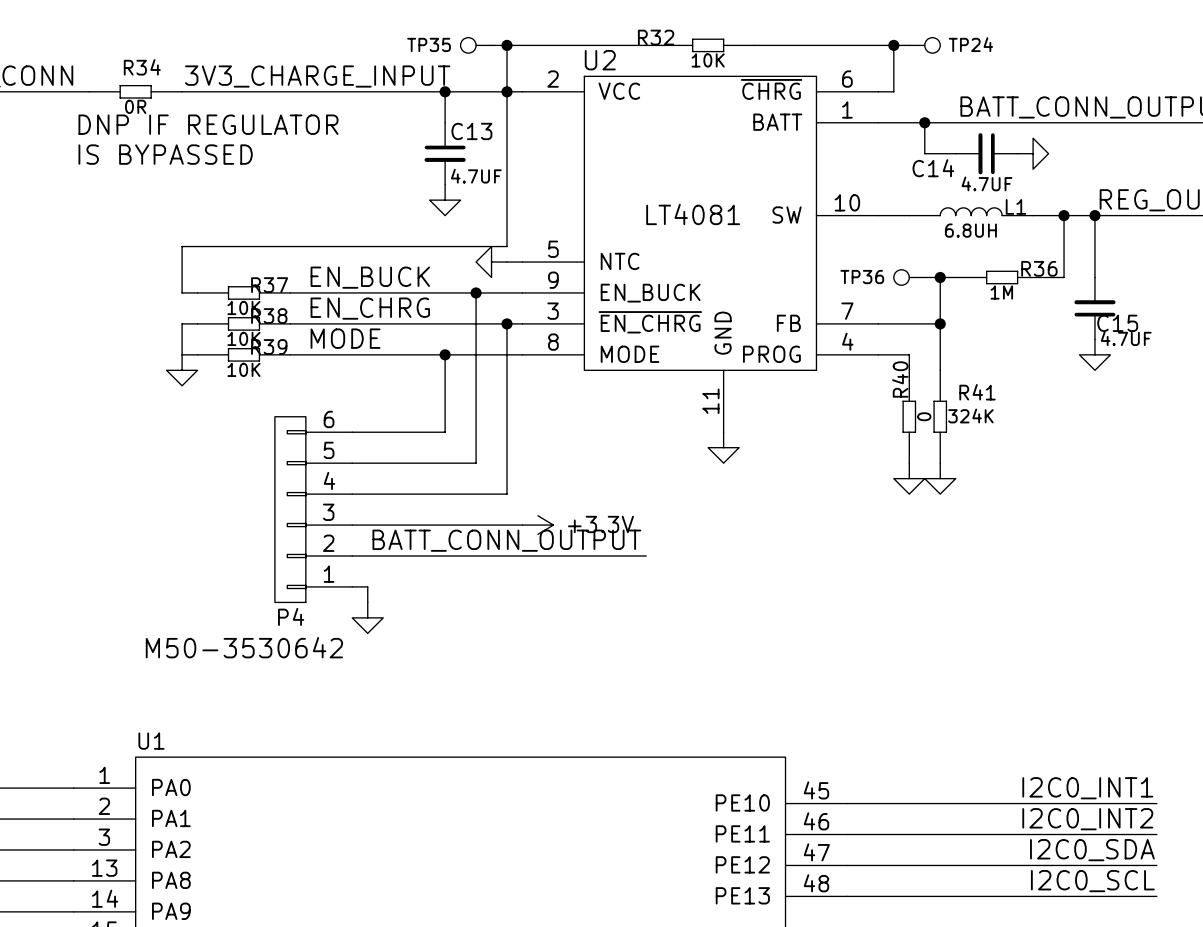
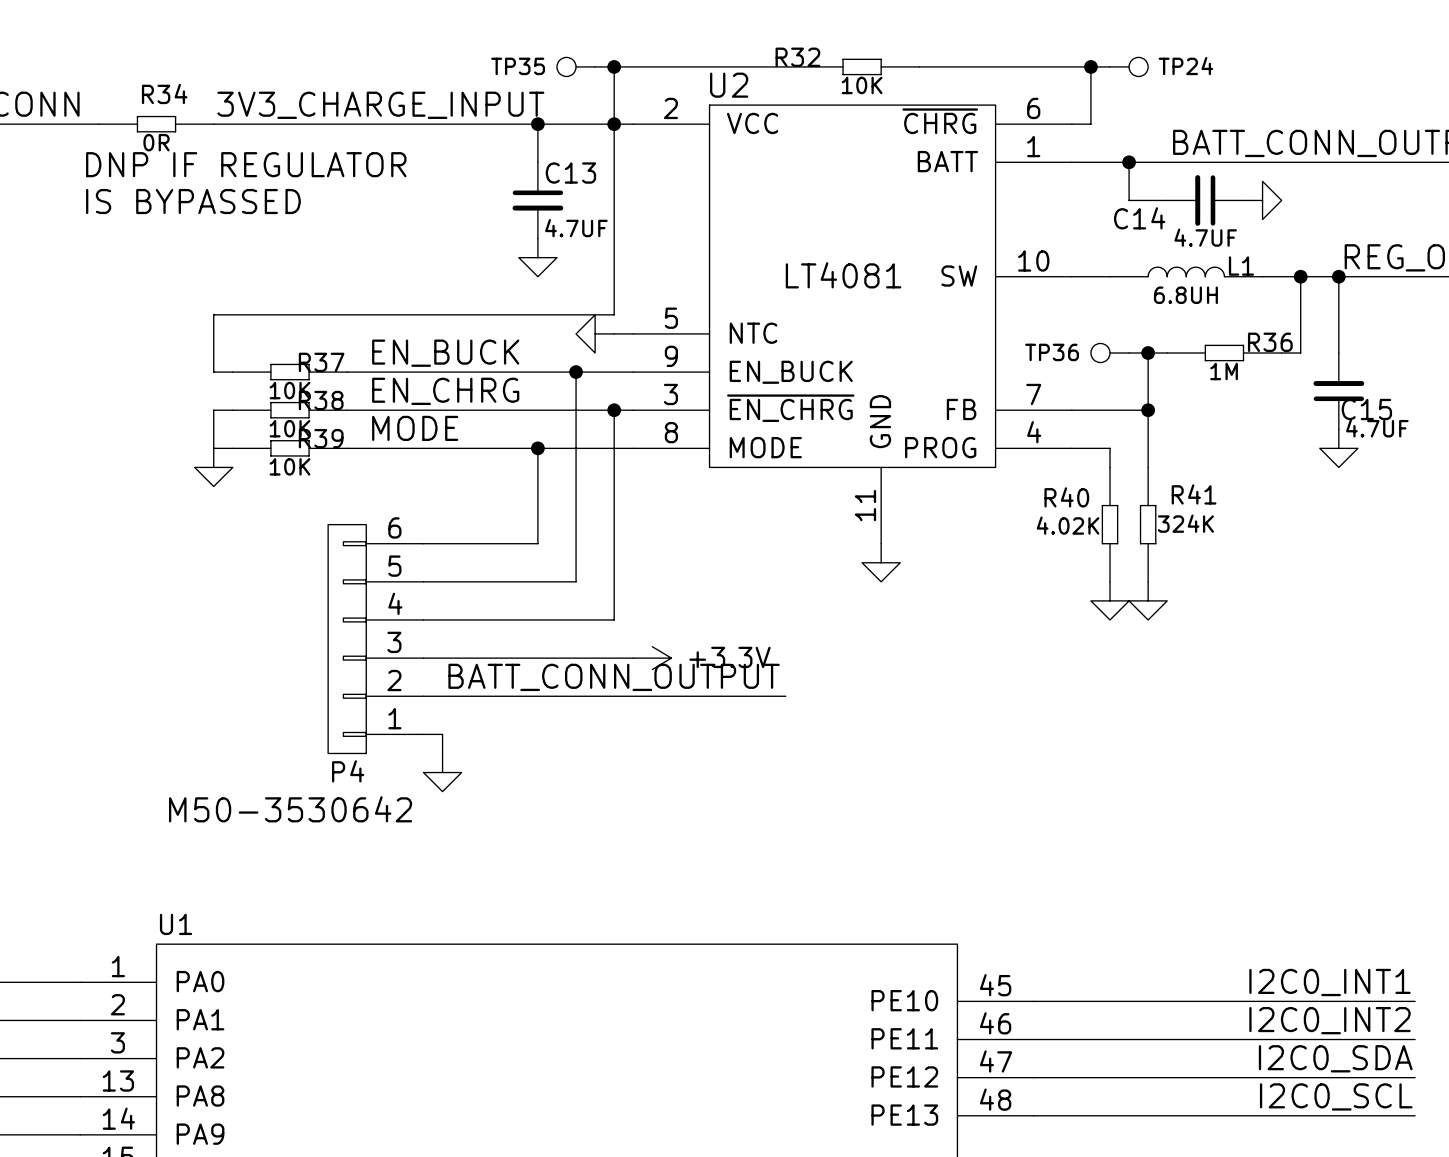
R40 name rotation: 0° (900, 379) -> 90° clockwise (1066, 497)
R40 text: 0 (924, 416) -> 4.02K (1068, 525)

